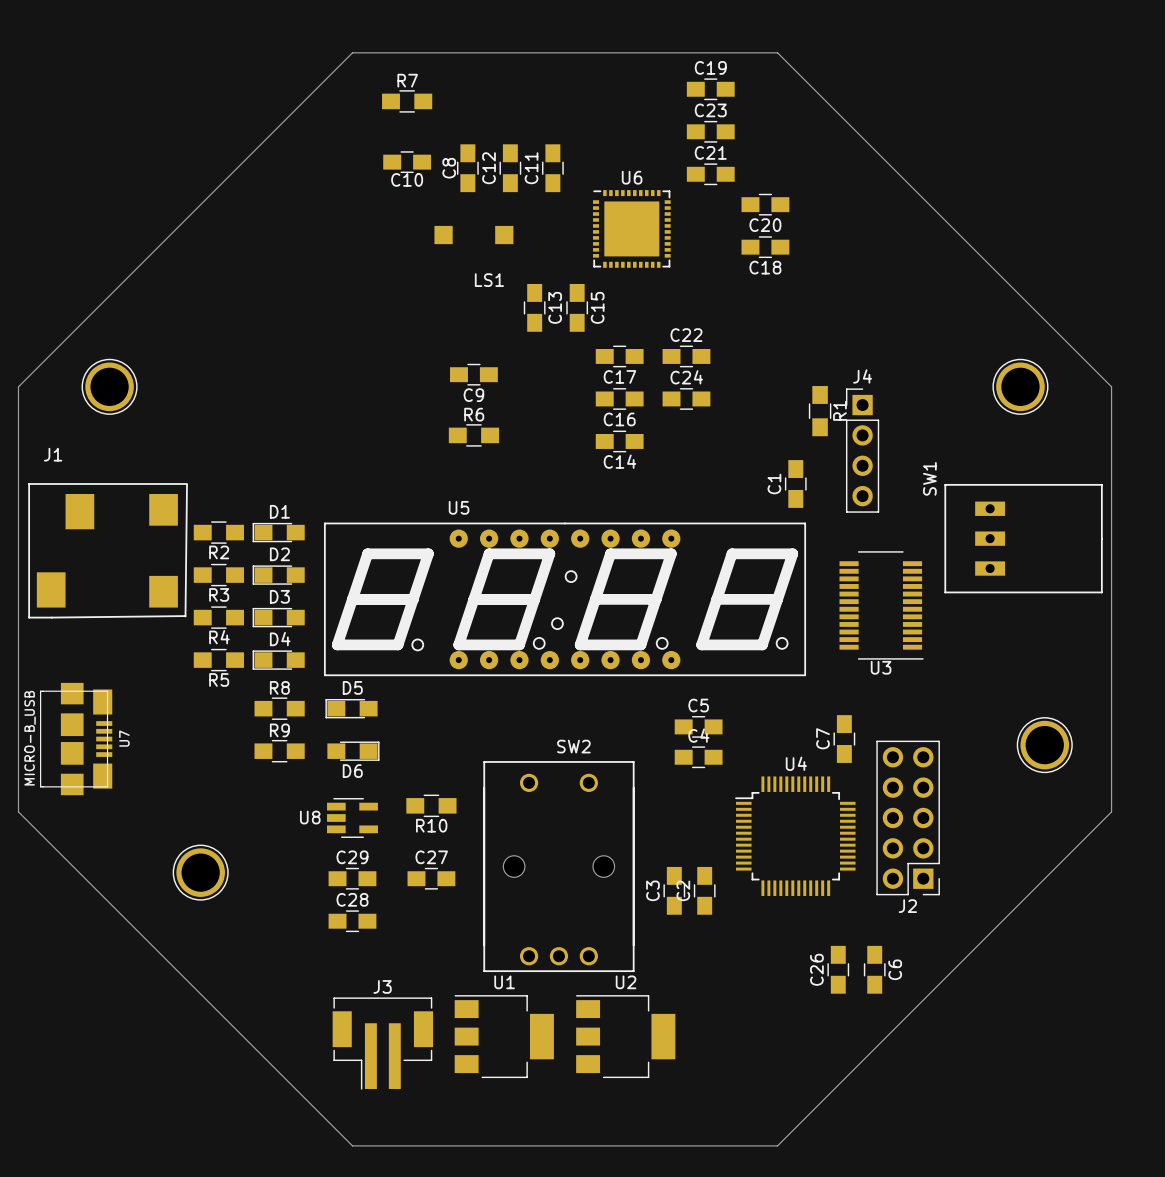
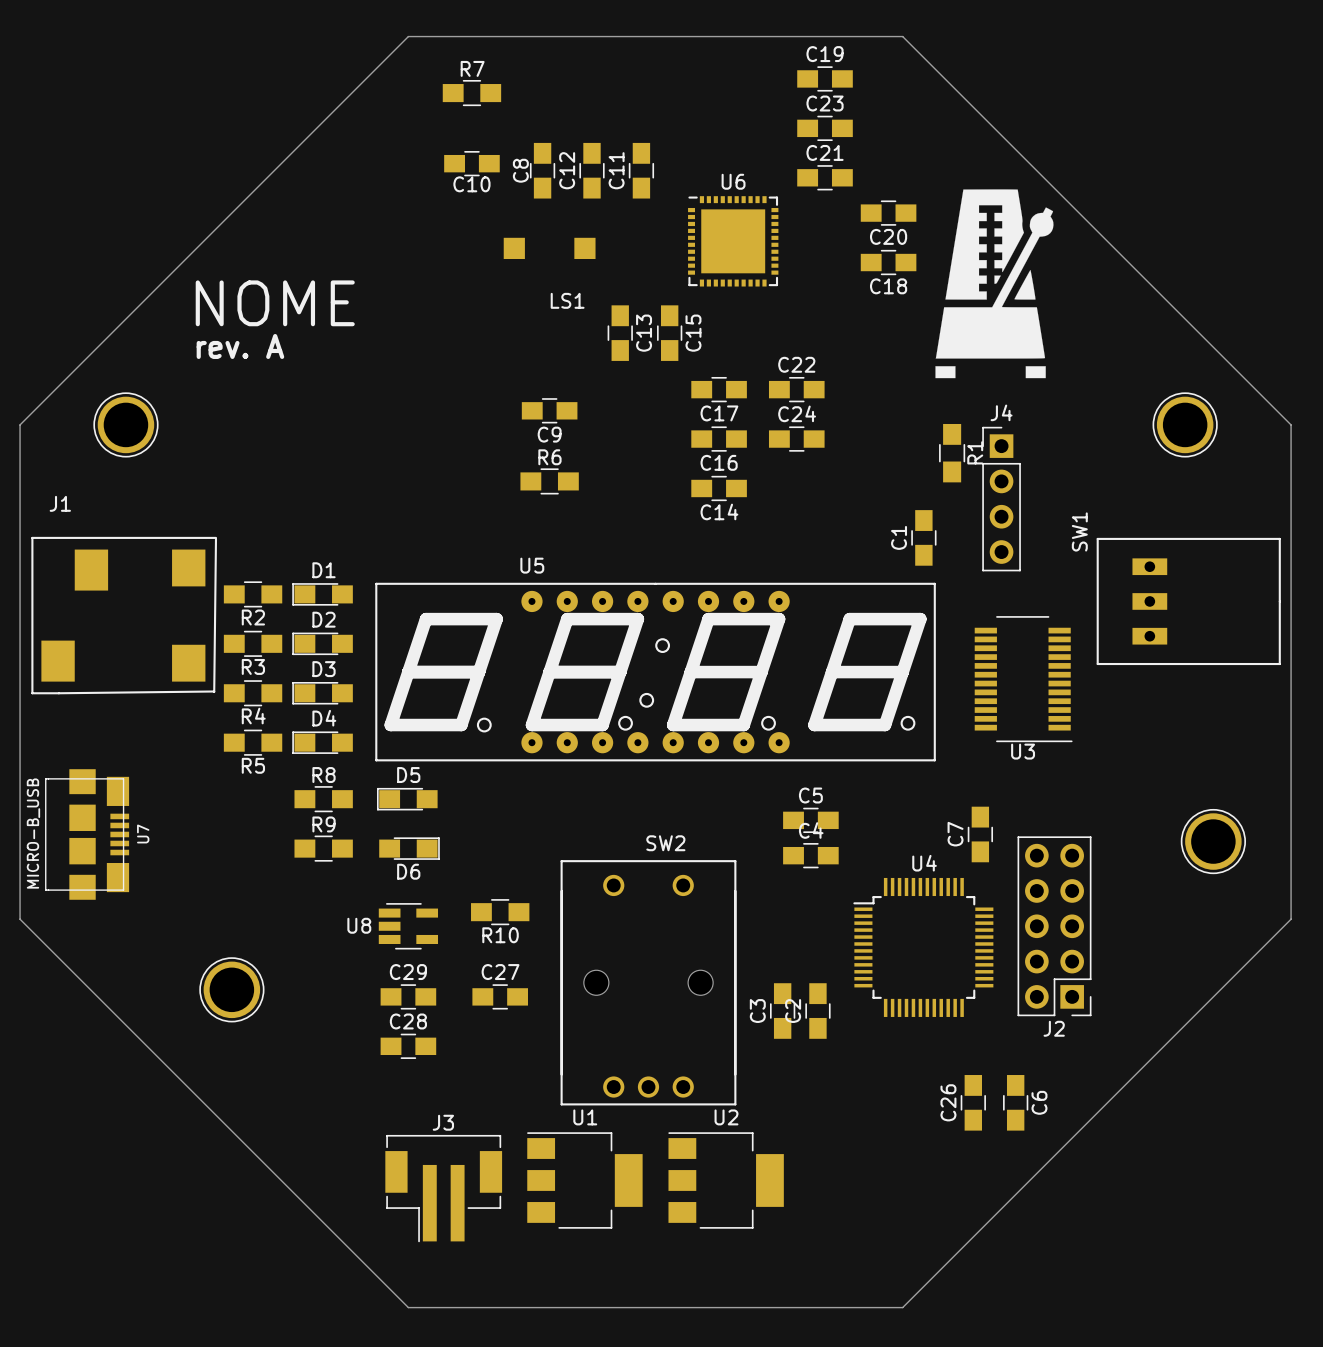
drawing: none -> [935, 189, 1054, 379]
text: none -> NOME (275, 303)
text: none -> rev. A (240, 346)

